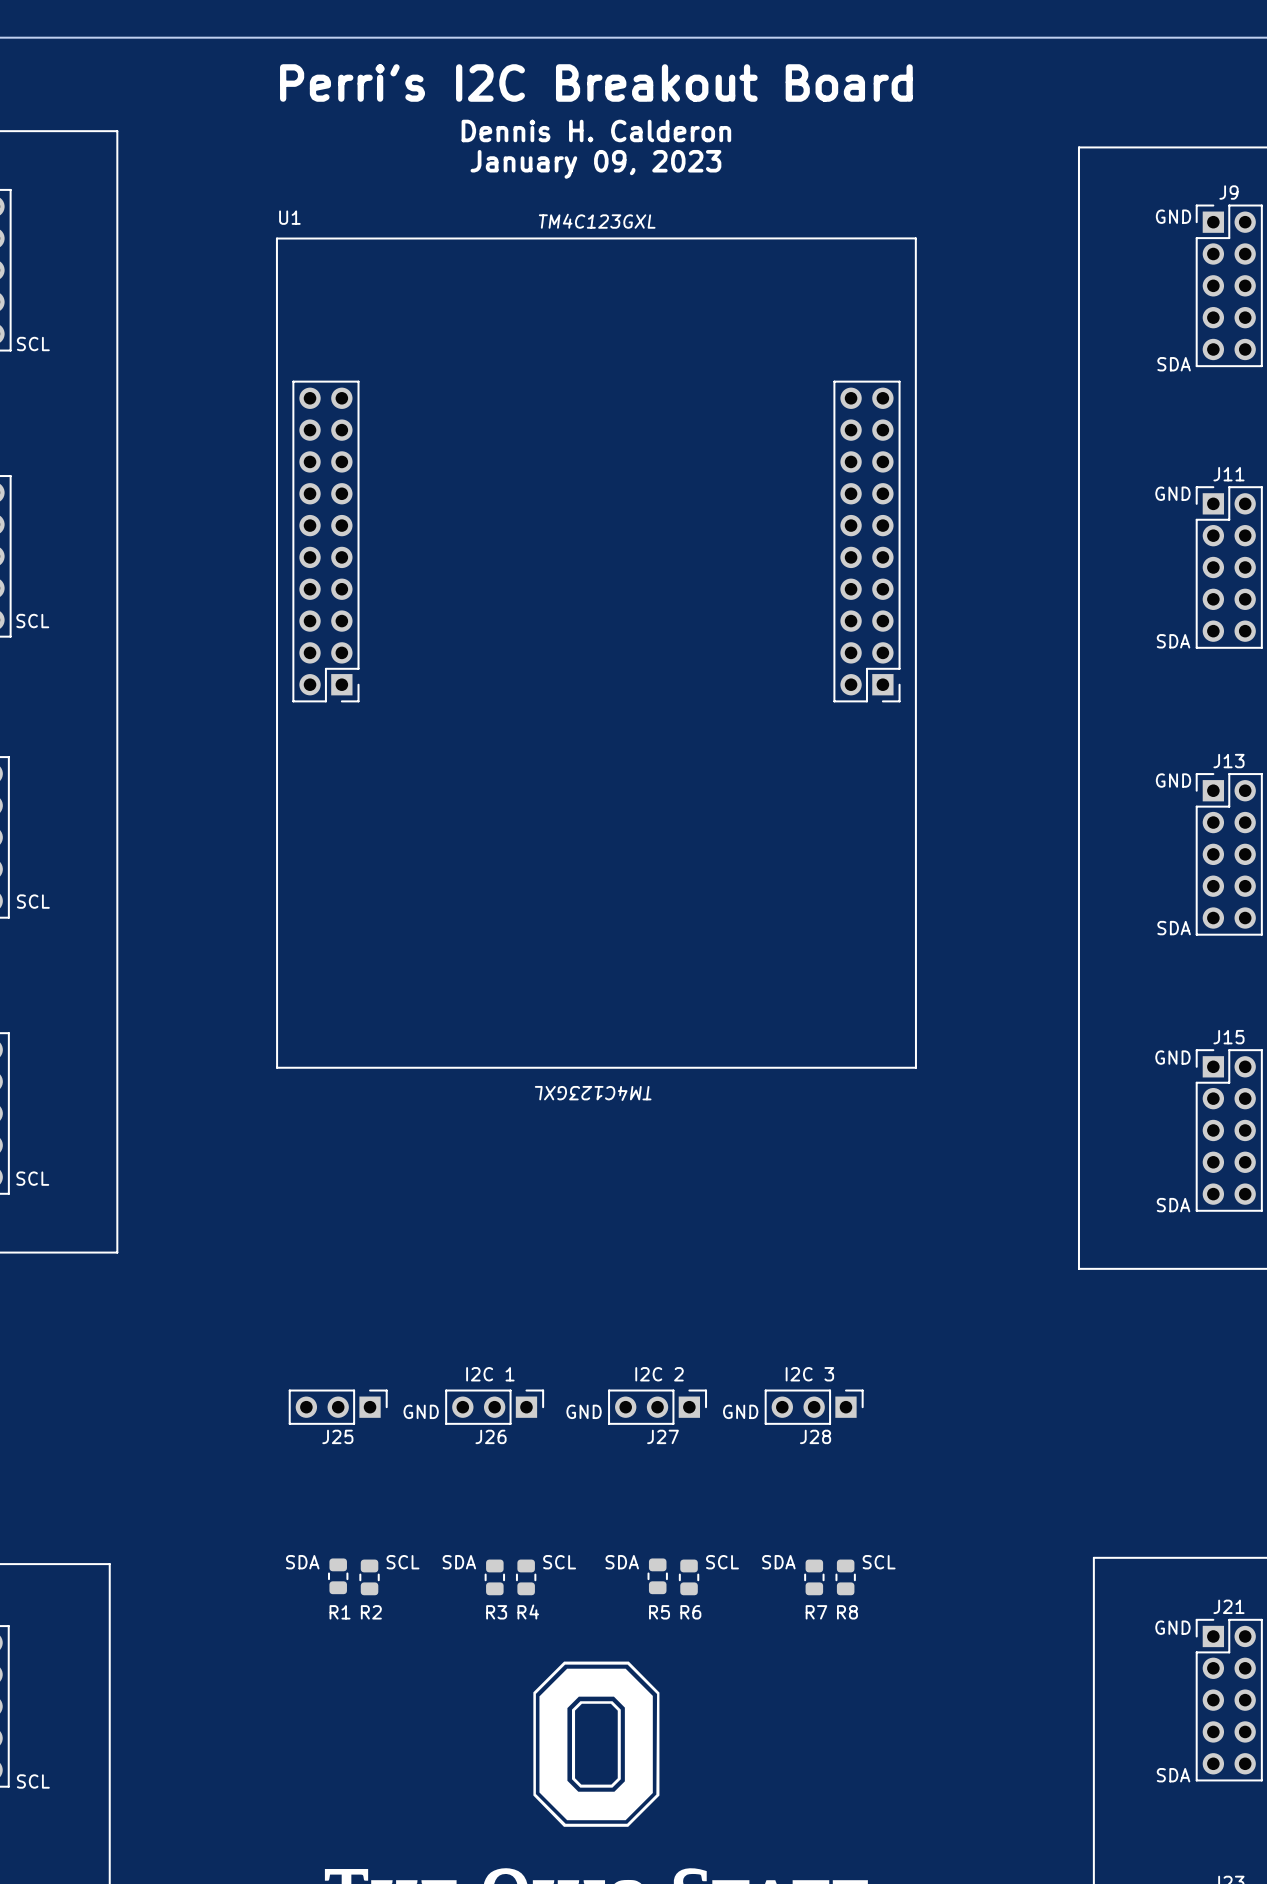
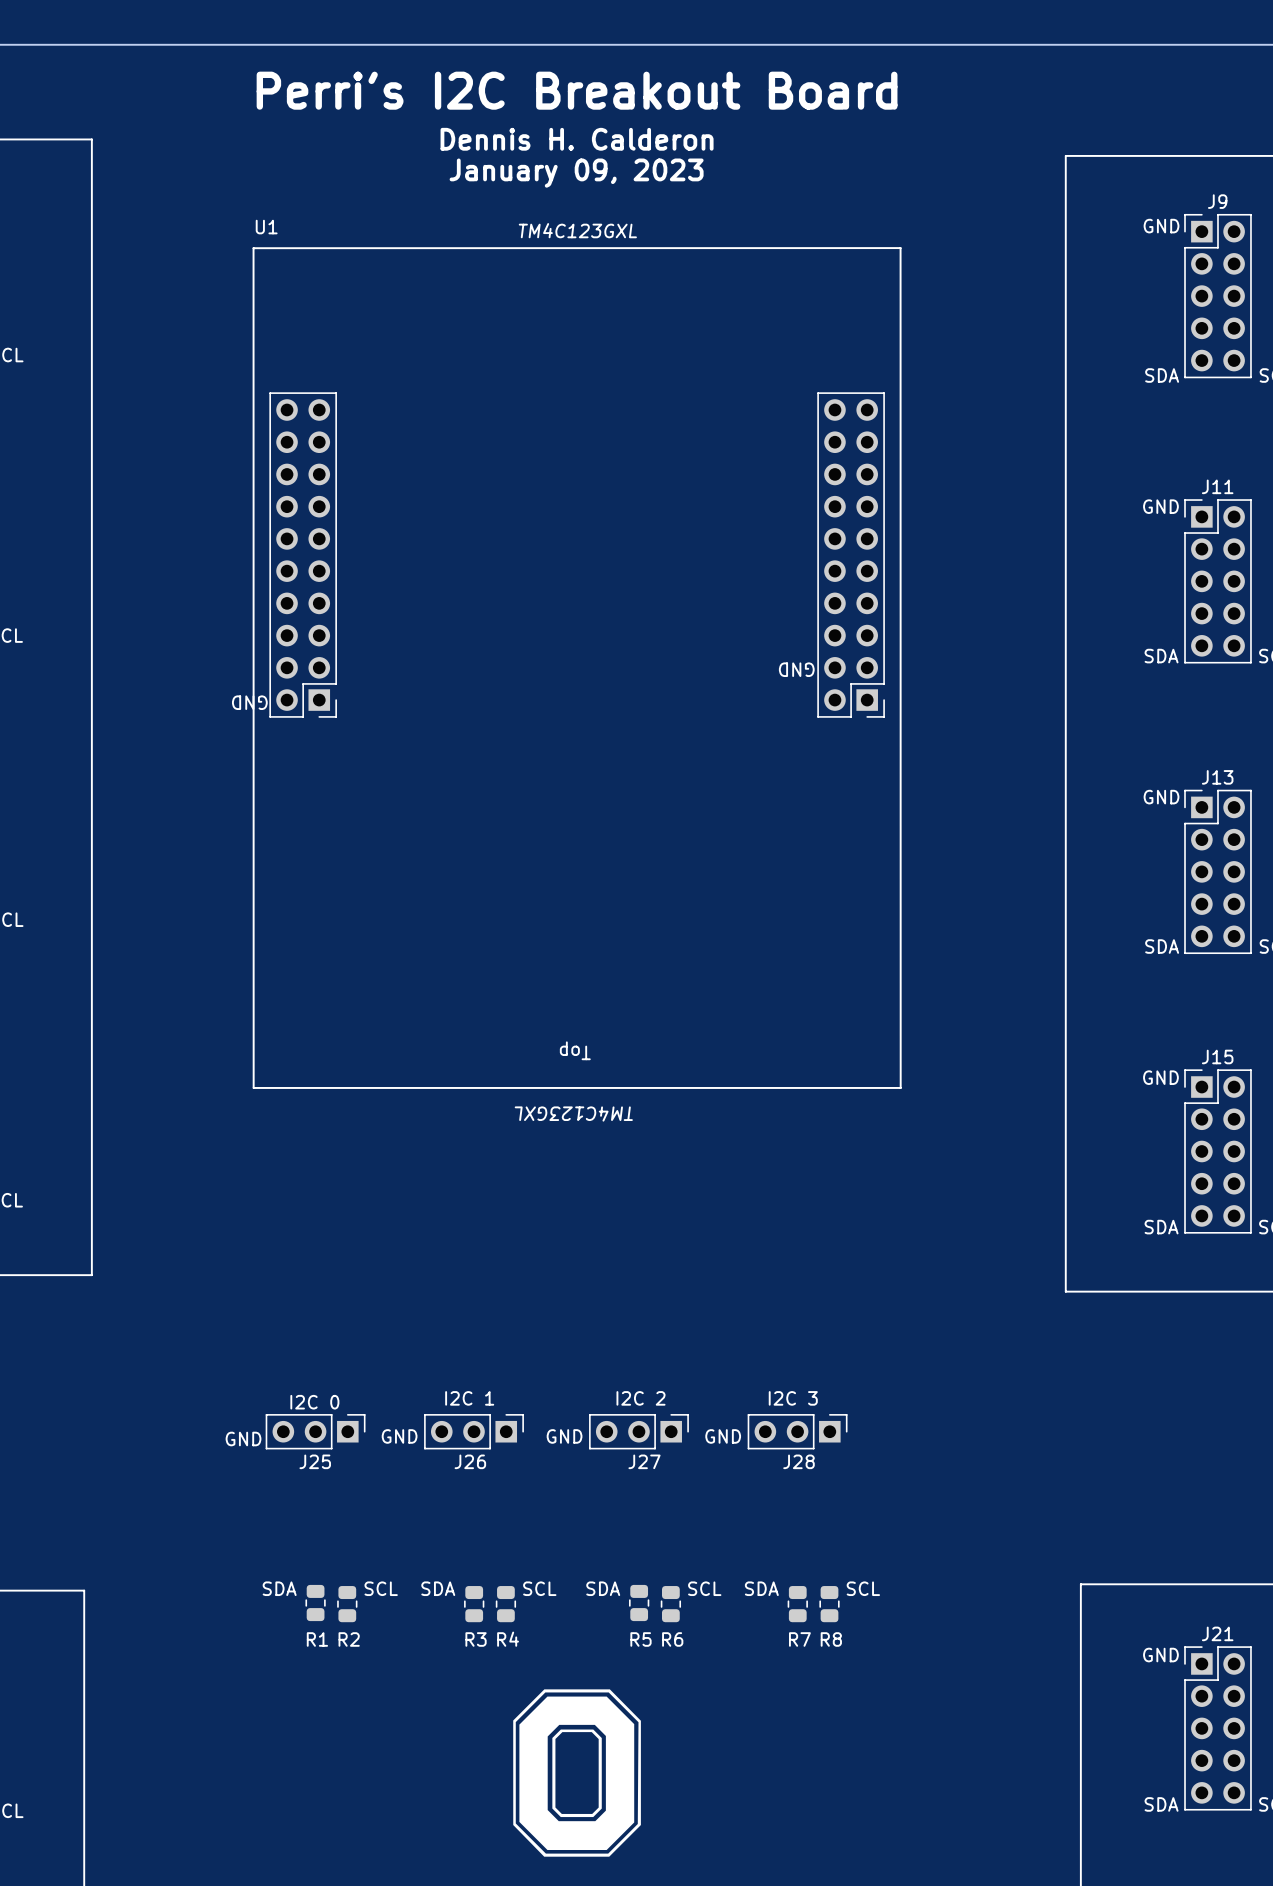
text: none -> GND (796, 669)
text: none -> GND (249, 702)
text: none -> Top (575, 1050)
text: none -> I2C 0 (314, 1402)
text: none -> GND (243, 1438)

